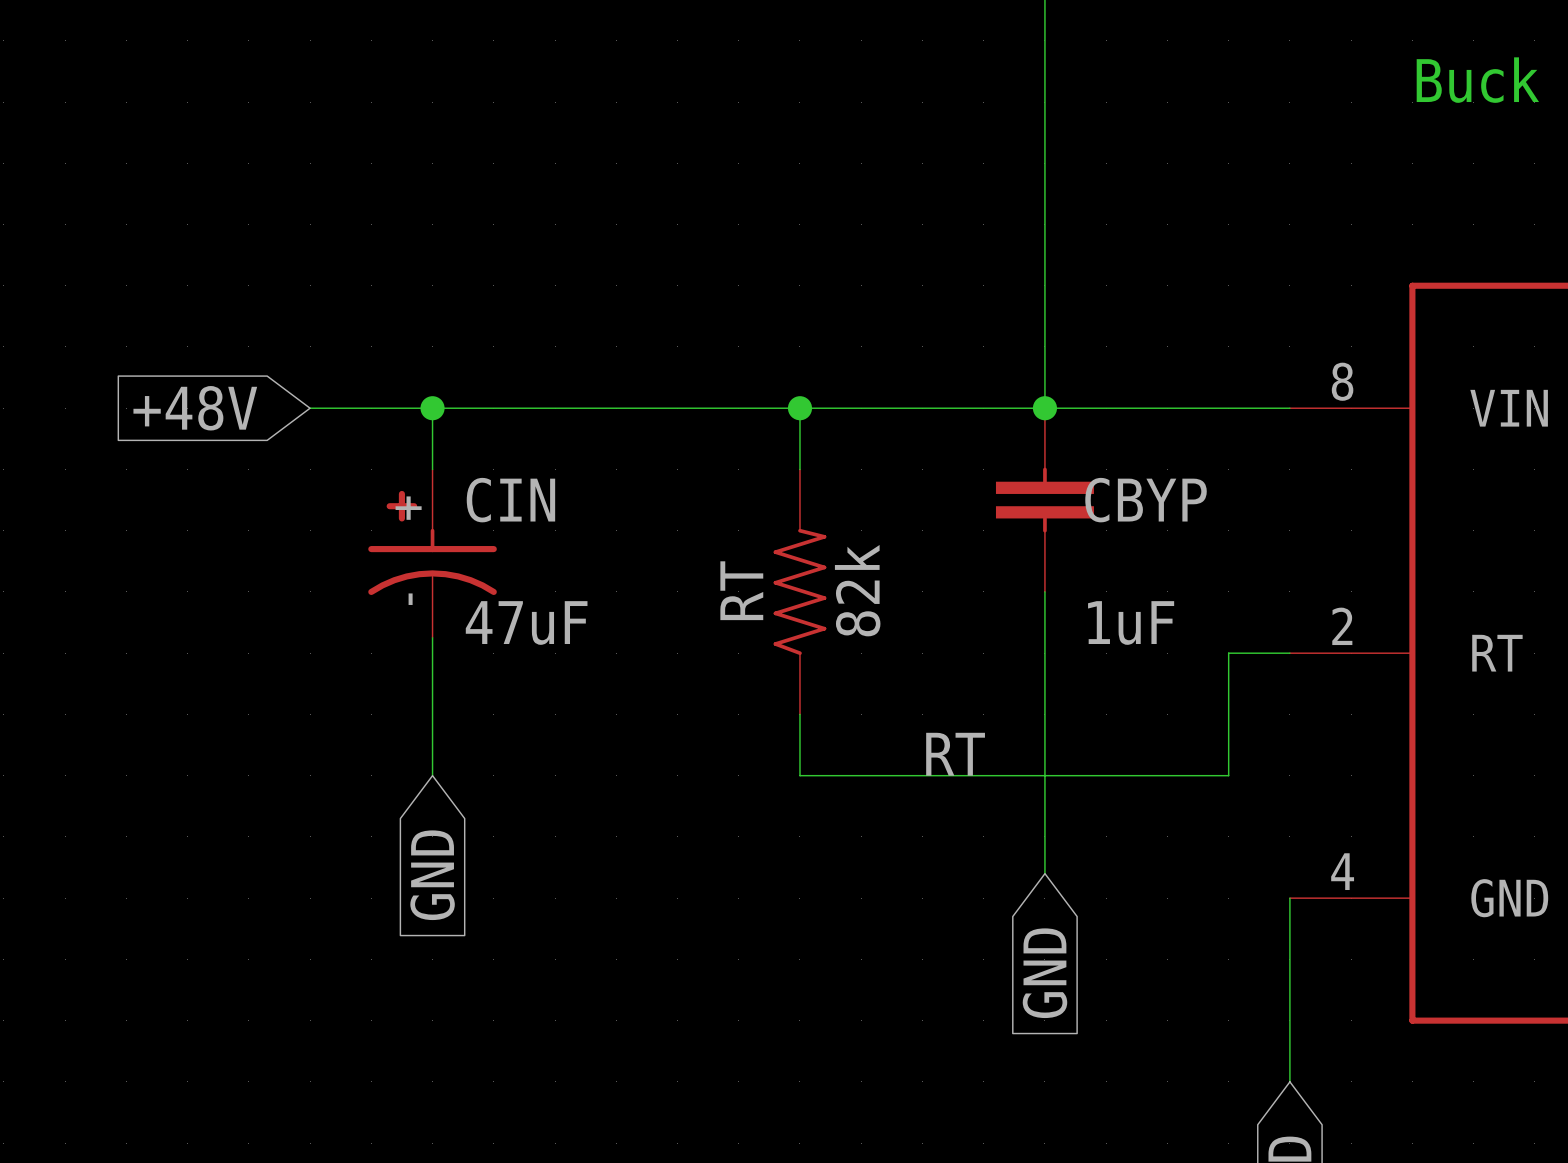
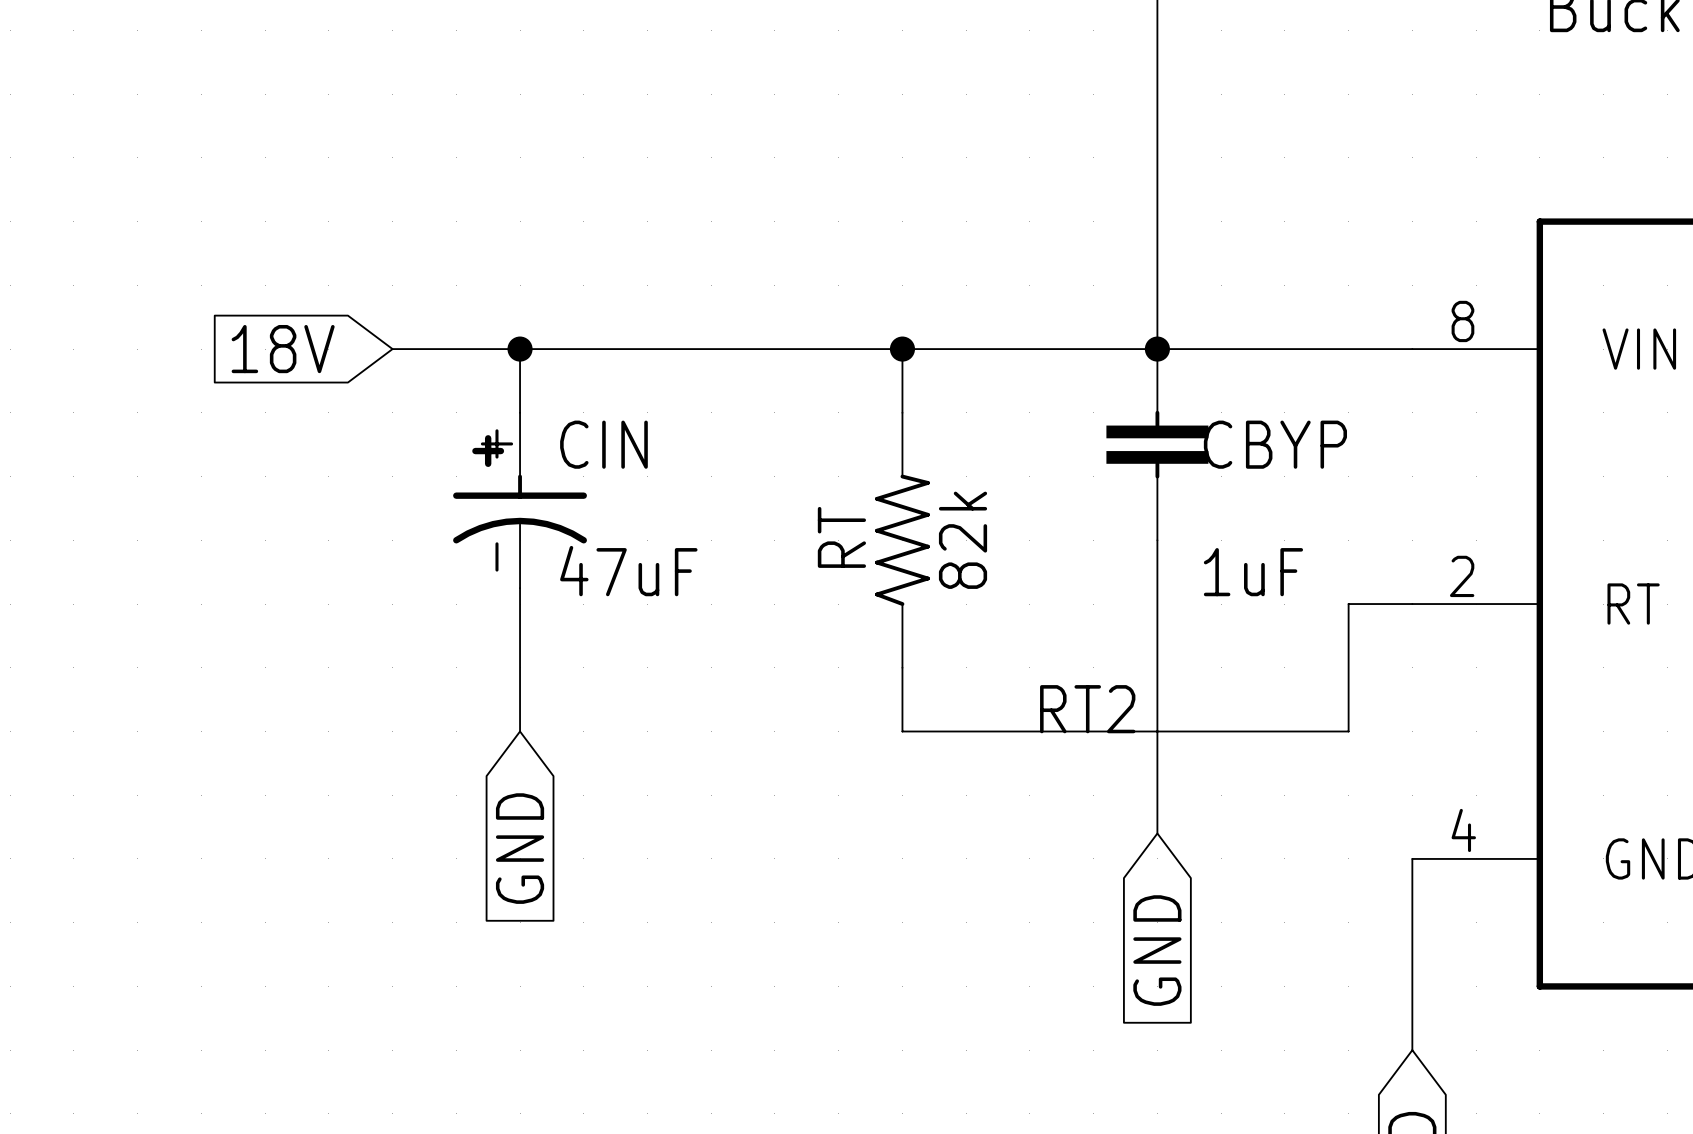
global label: +48V (195, 408) -> 18V (283, 349)
label: RT (955, 754) -> RT2 (1087, 709)

